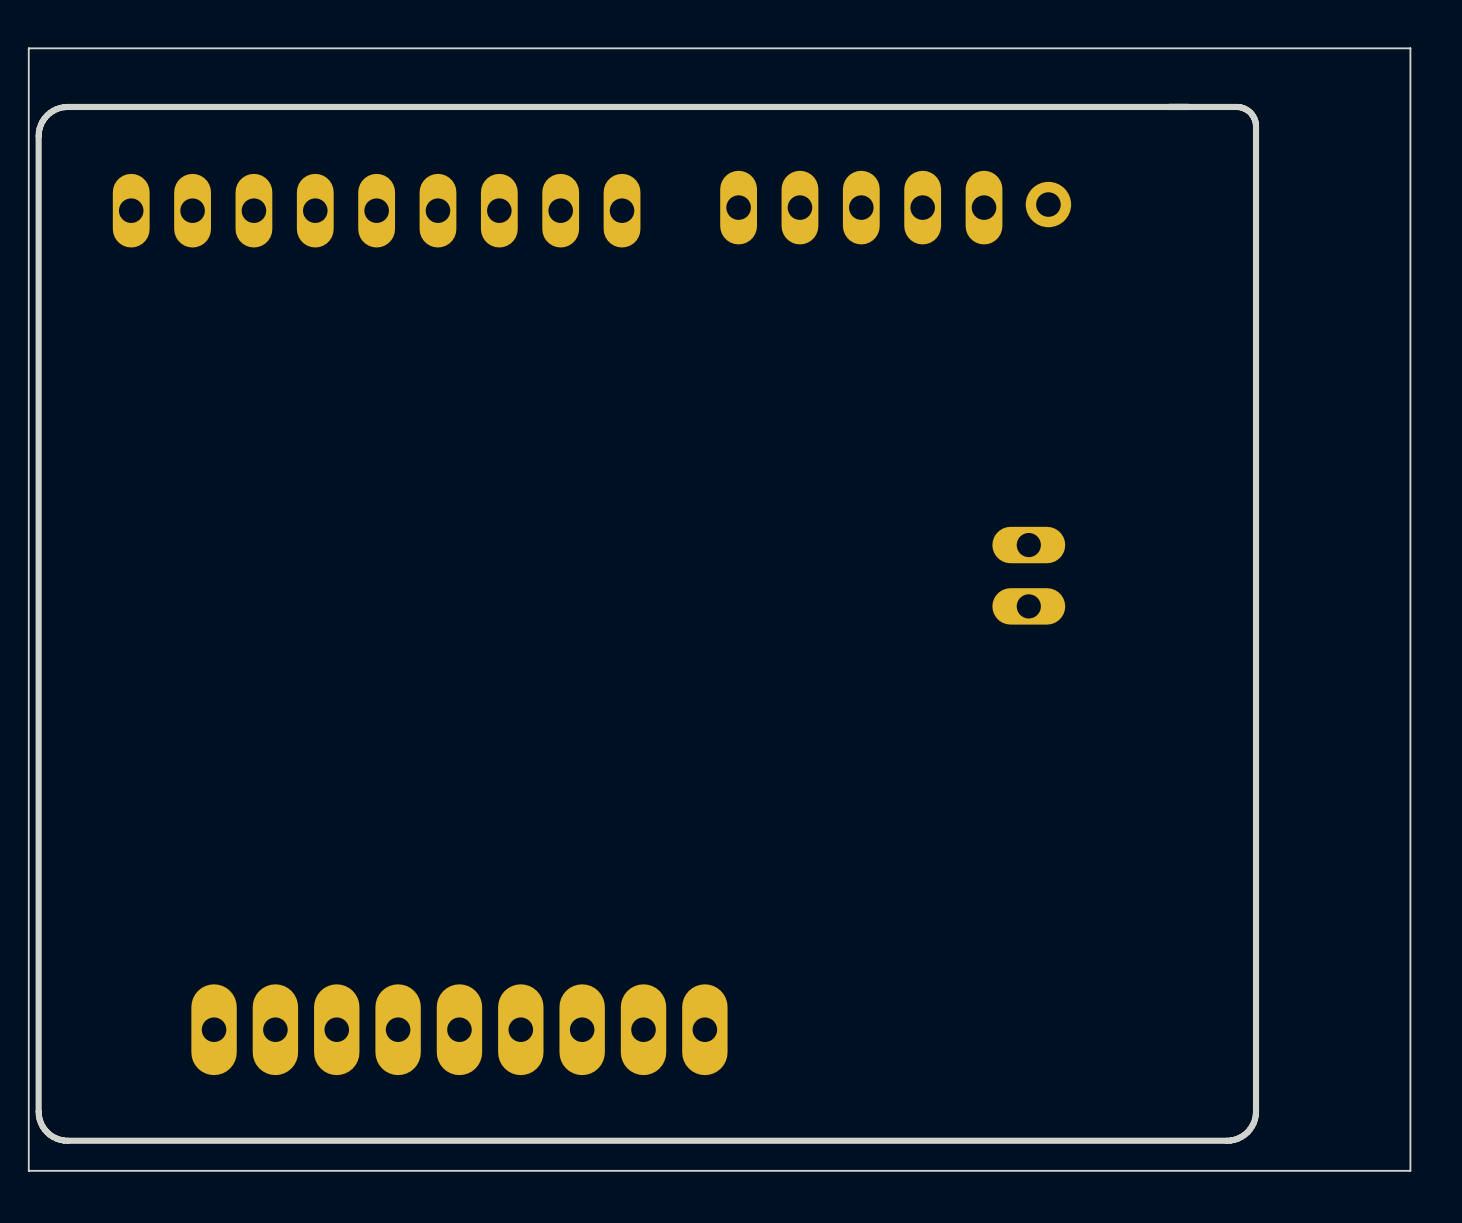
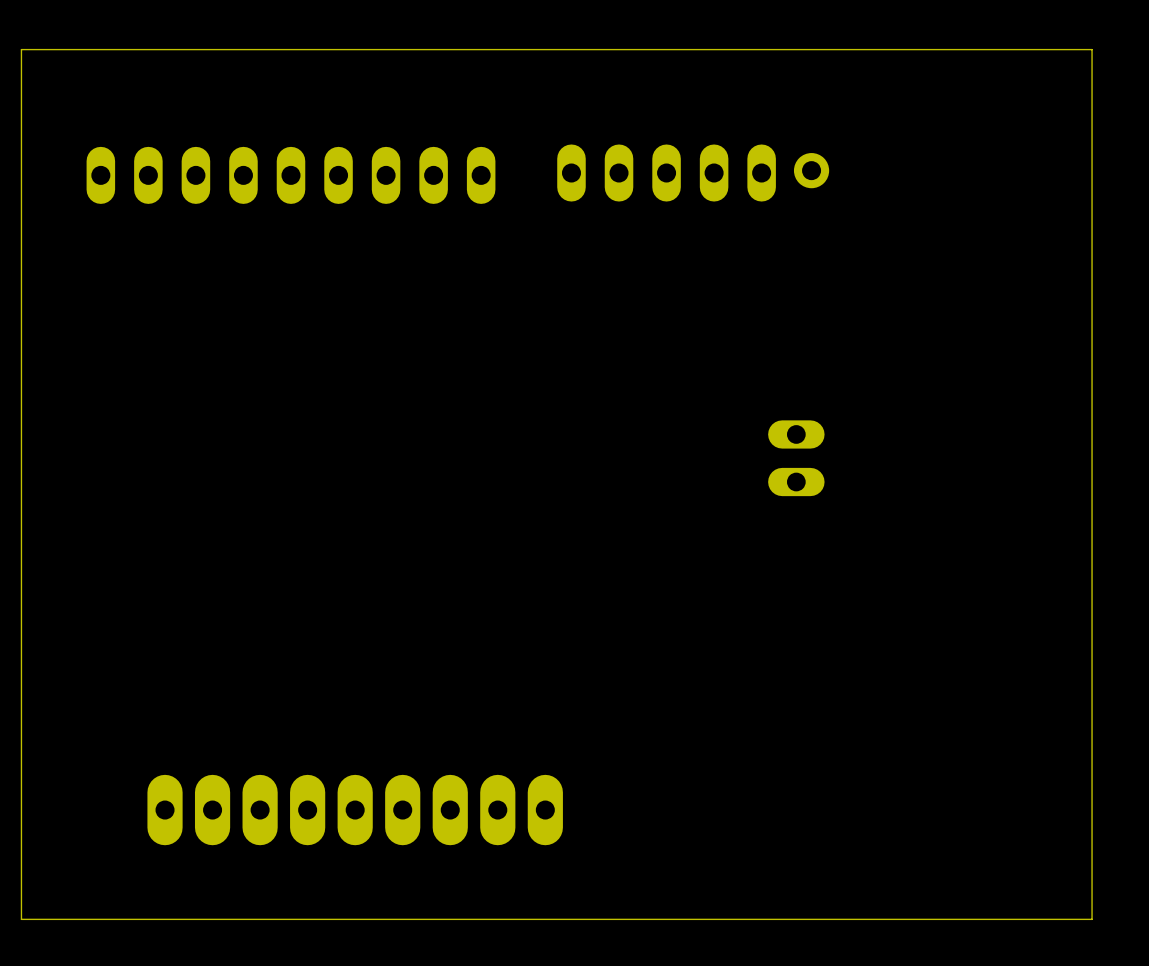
board edge: (1236, 106) (67, 106) (49, 112) (40, 124) (38, 135) (38, 1111) (44, 1129) (56, 1138) (67, 1140) (1227, 1140) (1244, 1134) (1253, 1122) (1256, 1111) (1256, 126) (1250, 112) (1236, 106) -> none

